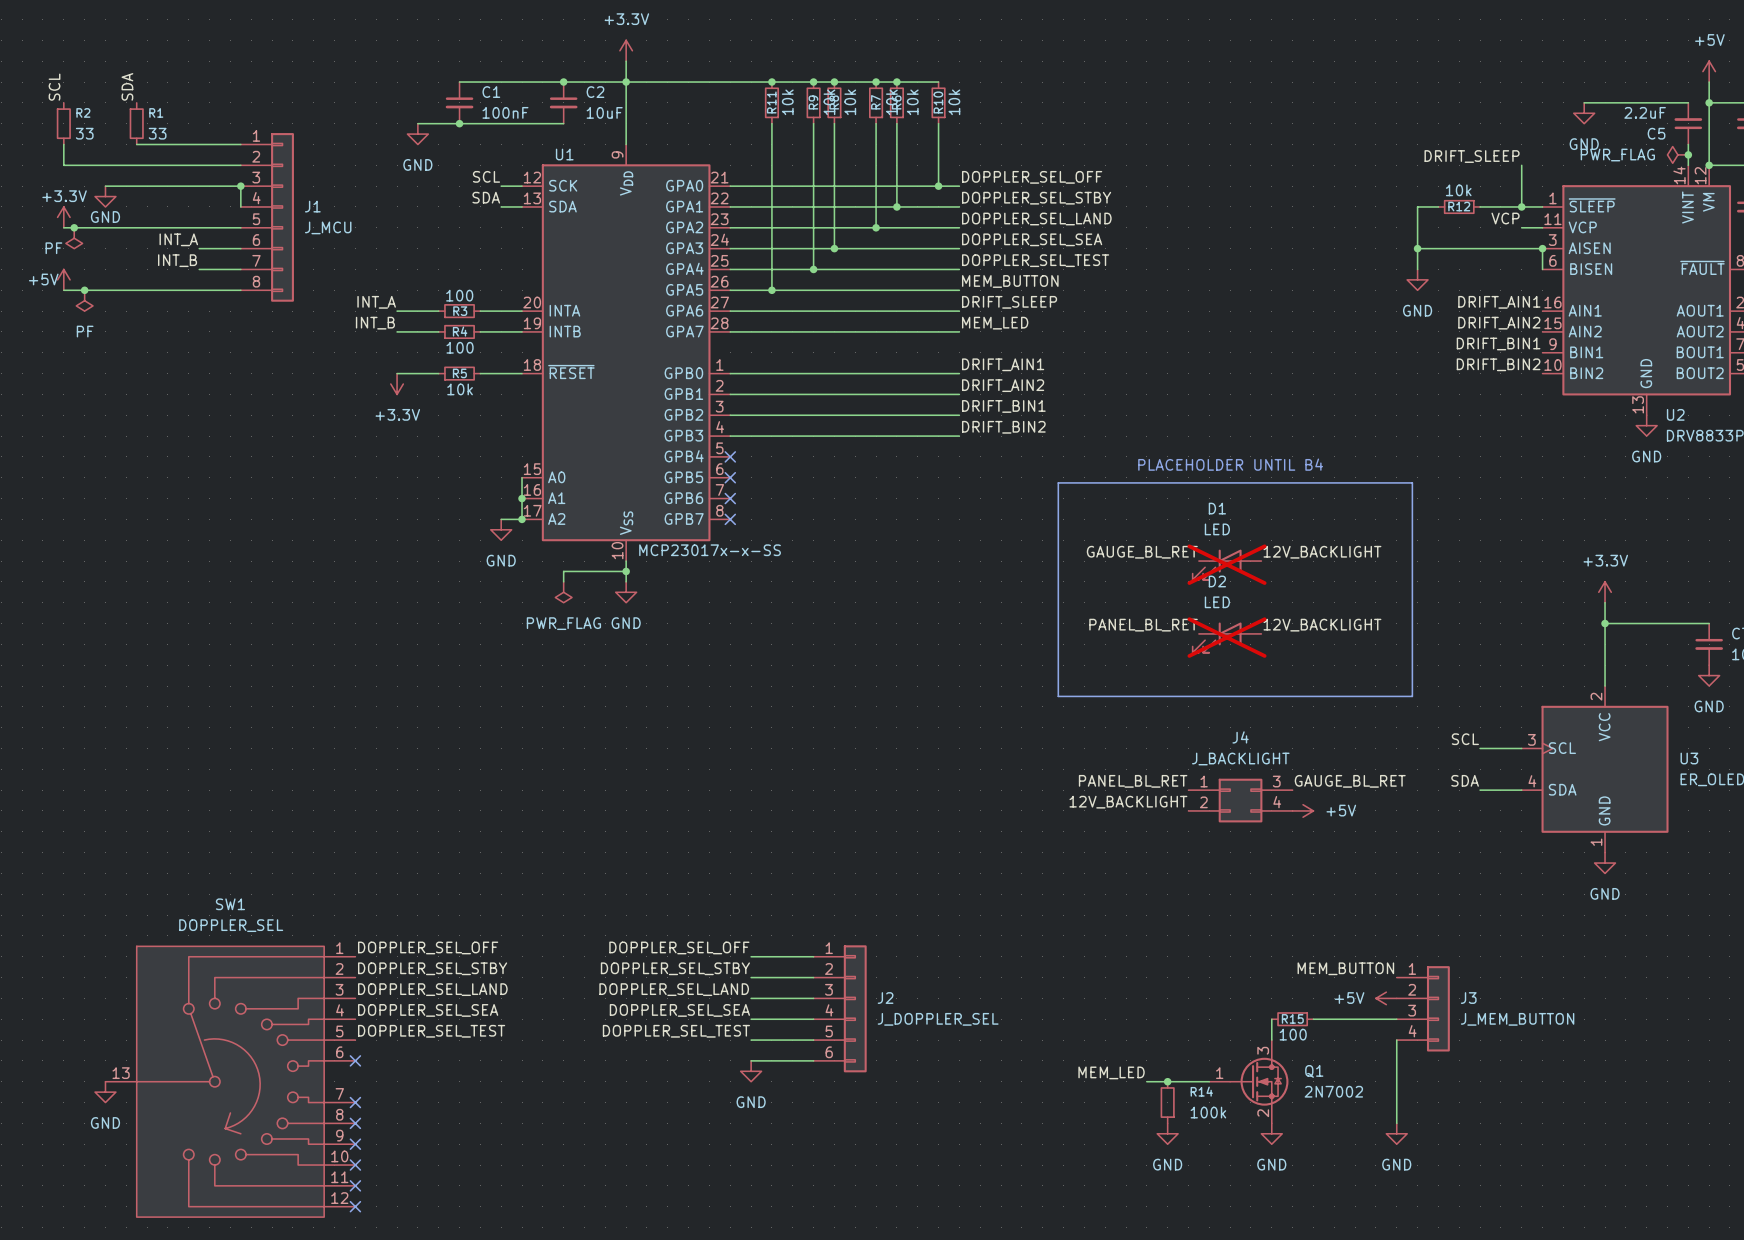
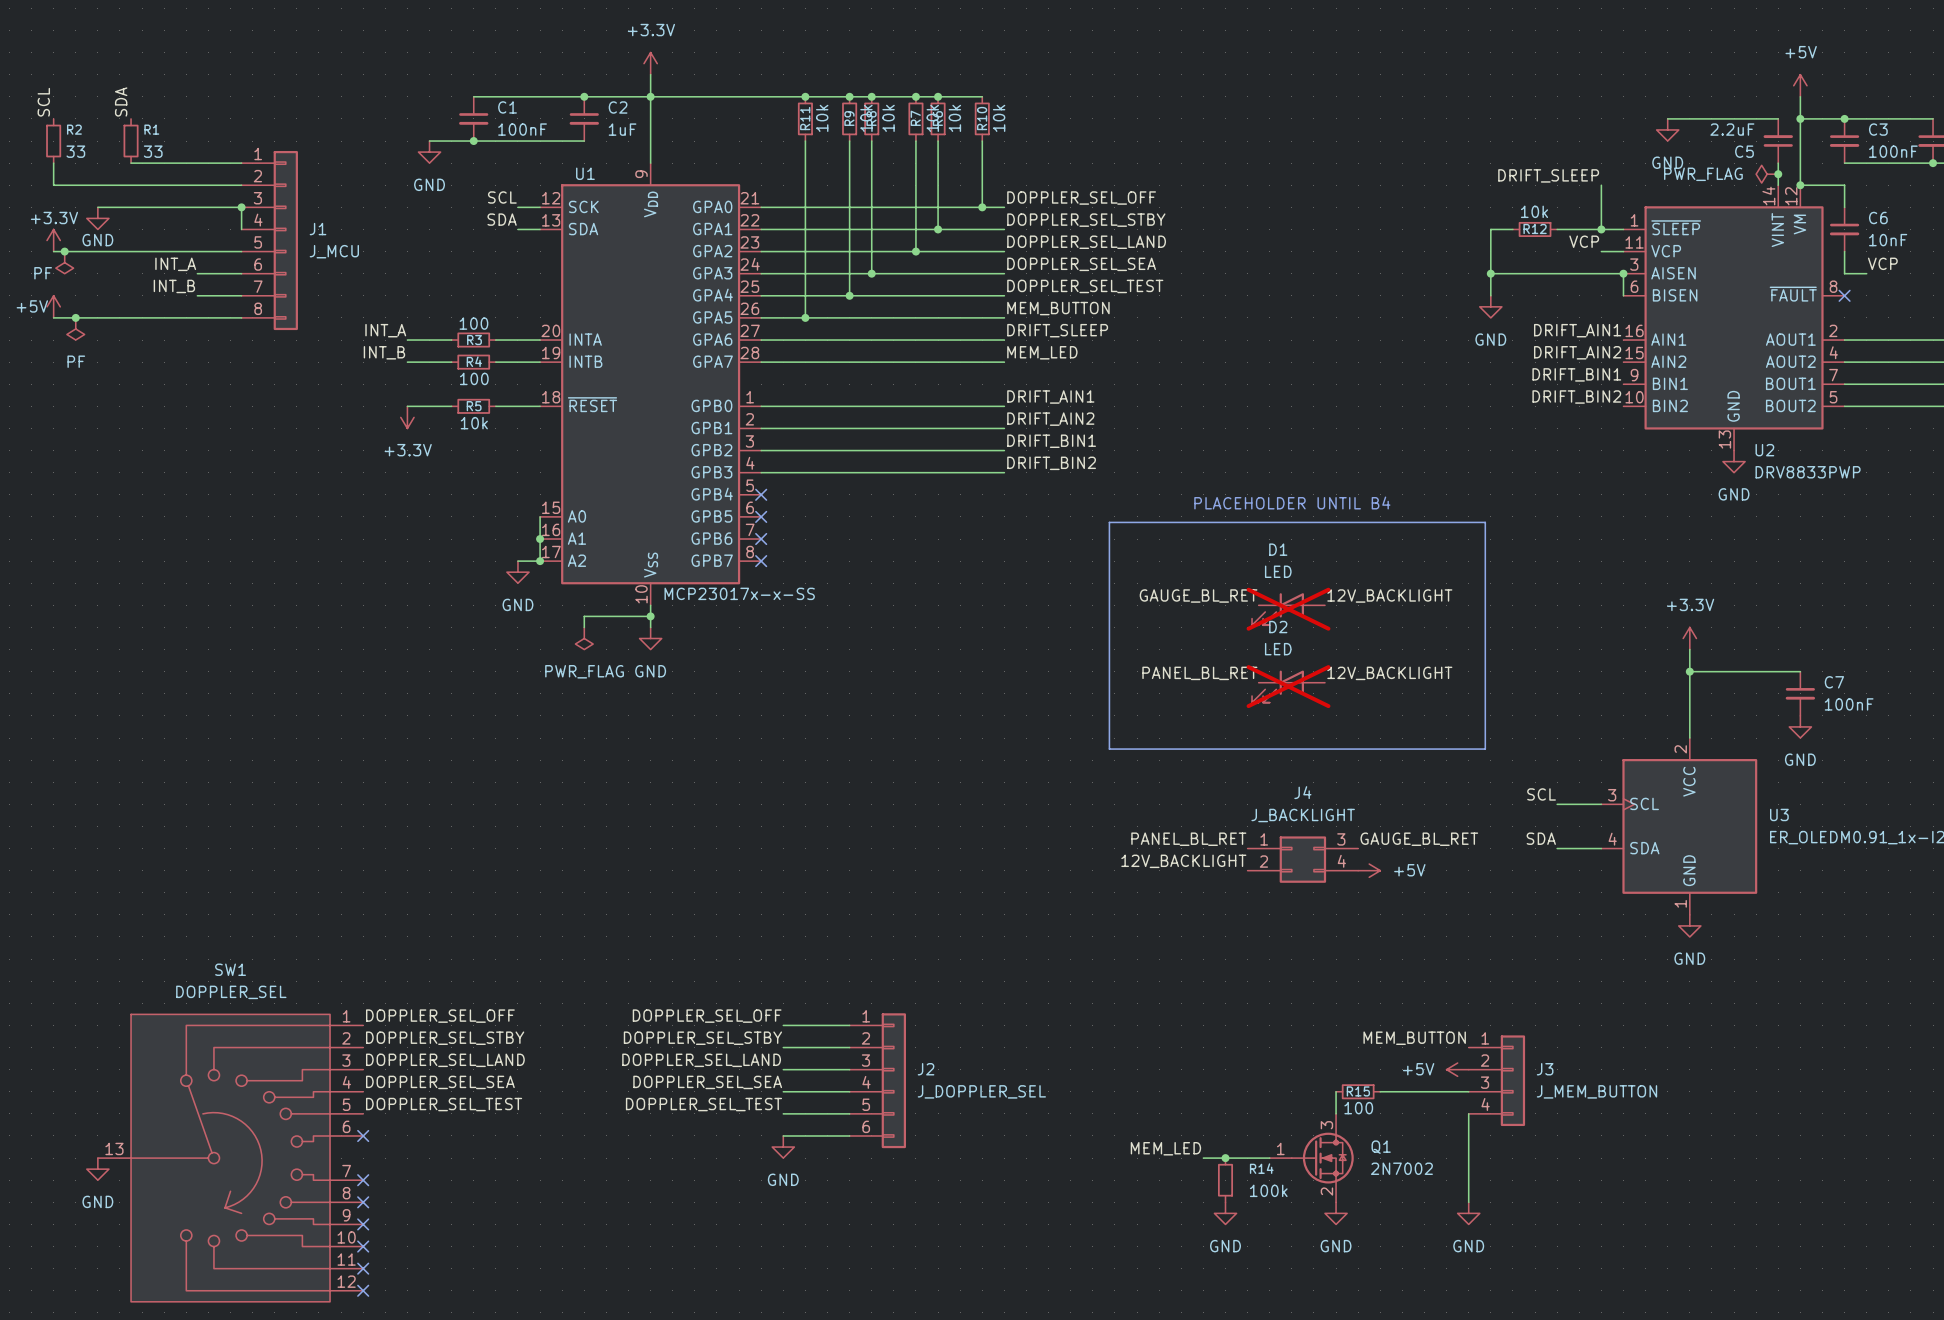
C2 value: 10uF (604, 112) -> 1uF (622, 129)

